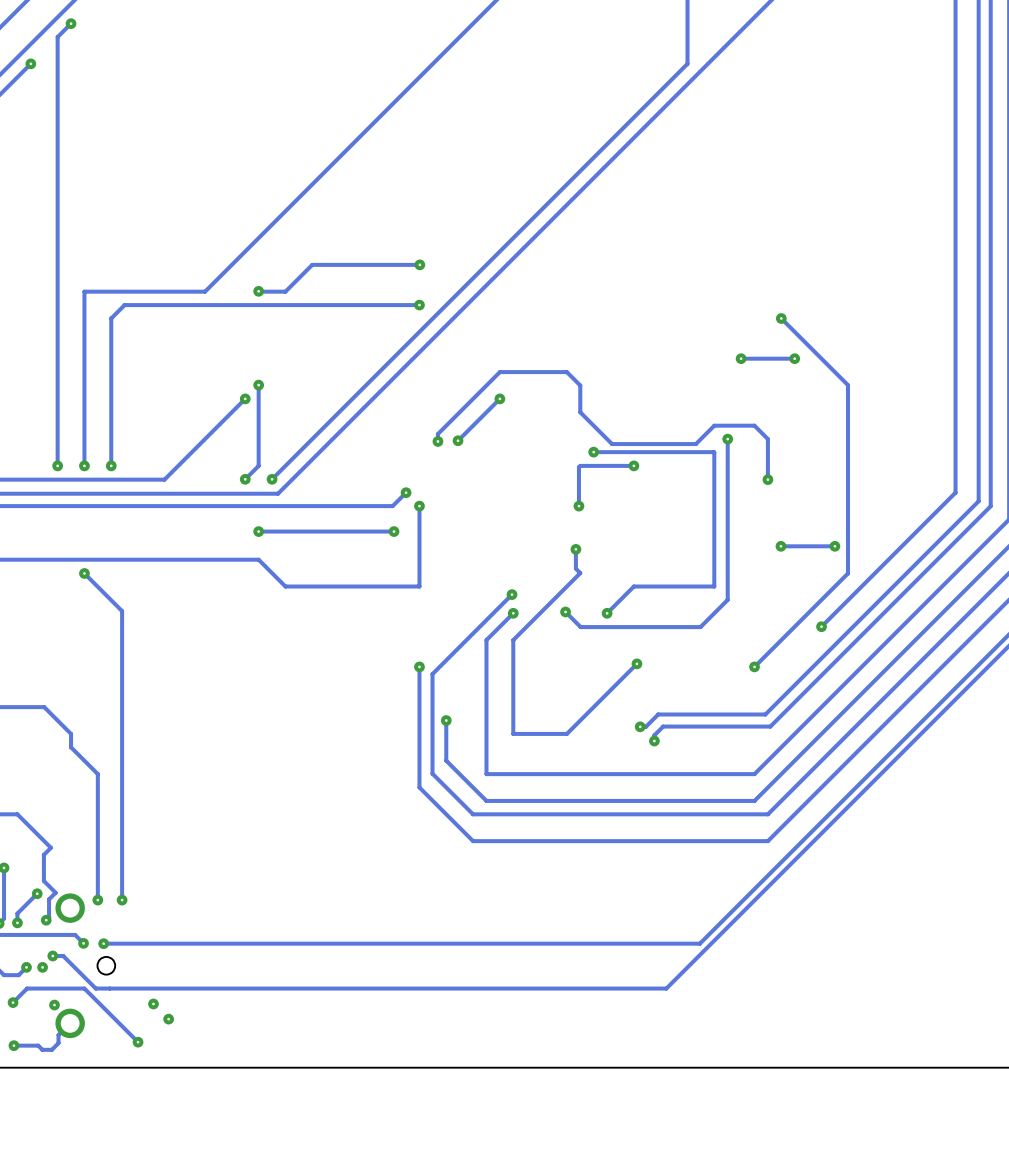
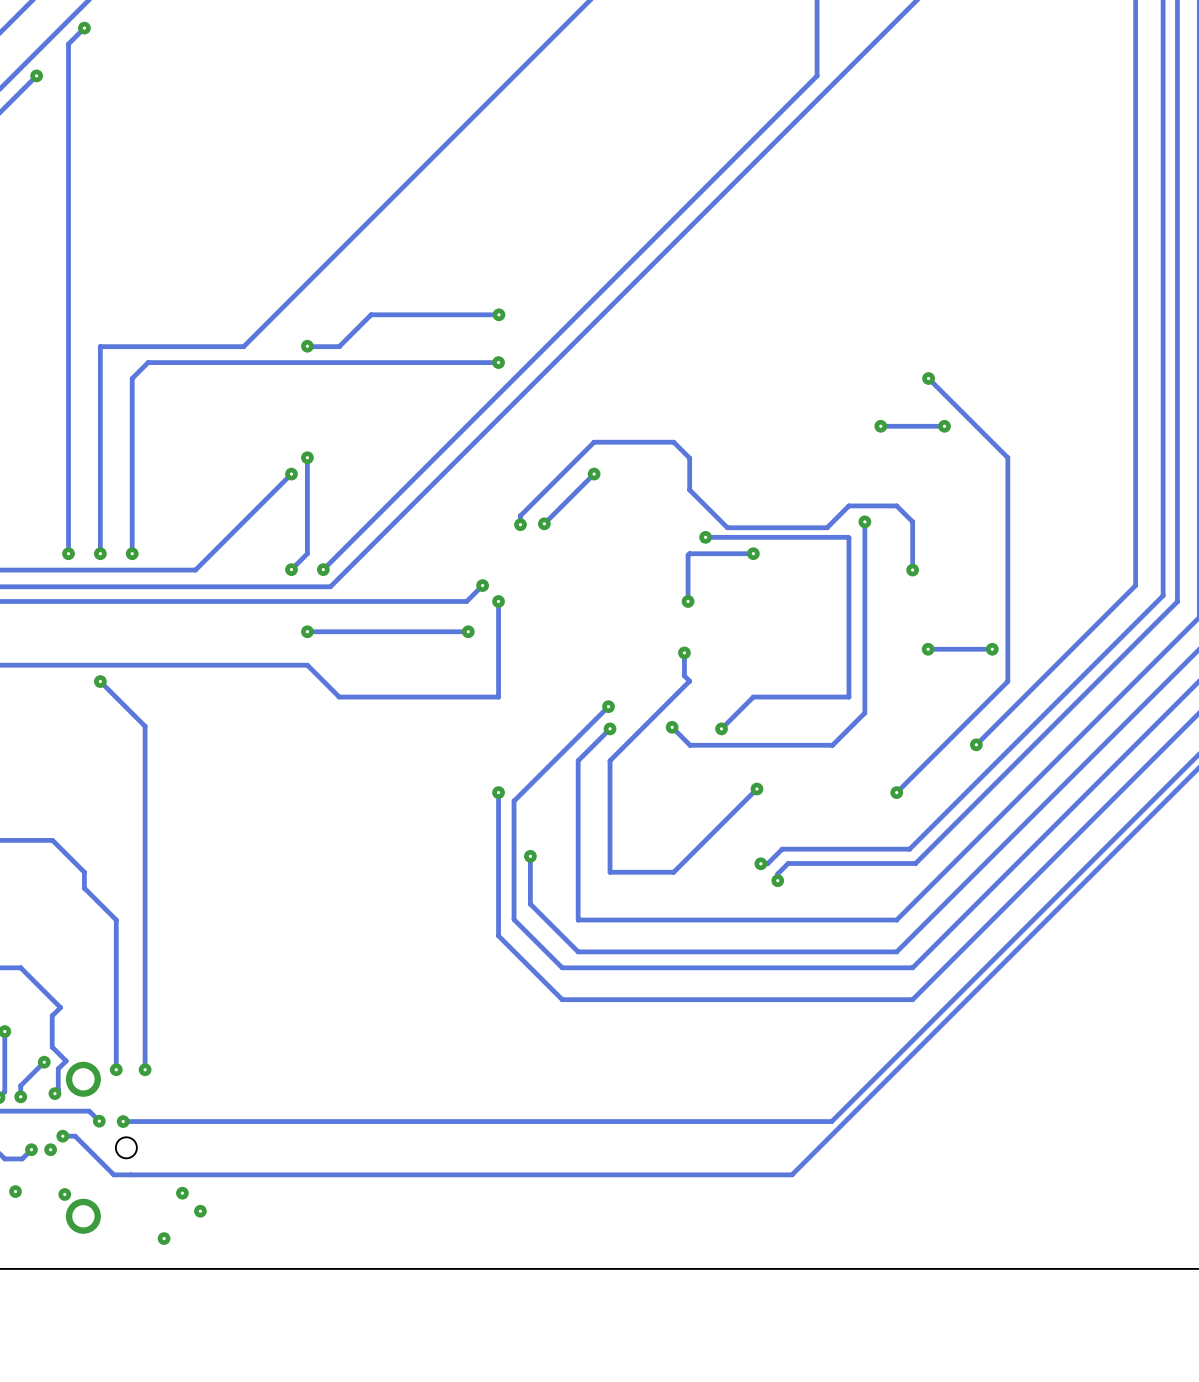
track: (13, 1002) (27, 988) (84, 988) (138, 1042) -> none
track: (70, 1023) (58, 1035) (58, 1043) (51, 1049) (42, 1049) (38, 1045) (13, 1045) -> none
via: (13, 1045) -> none

